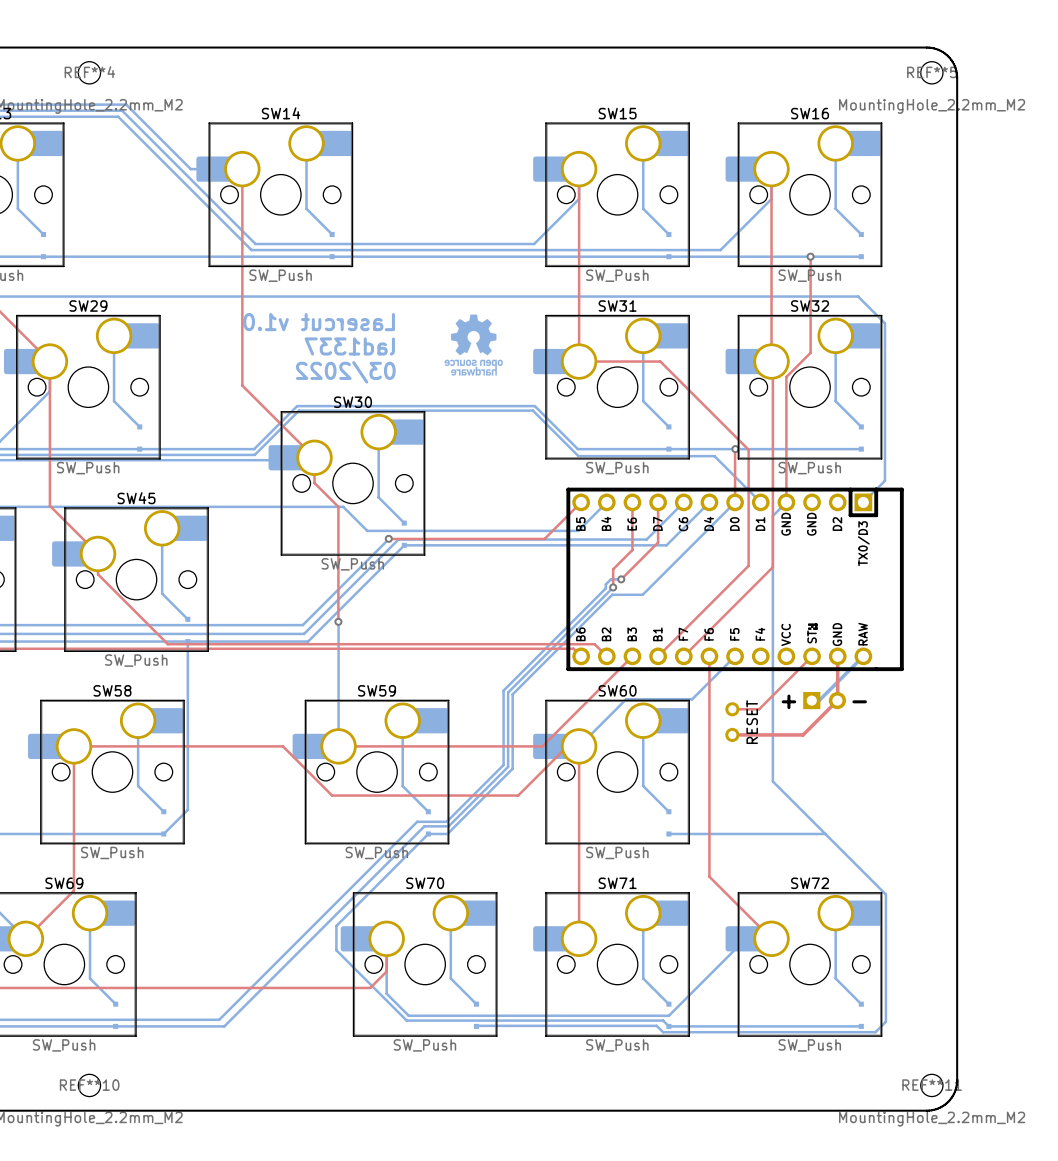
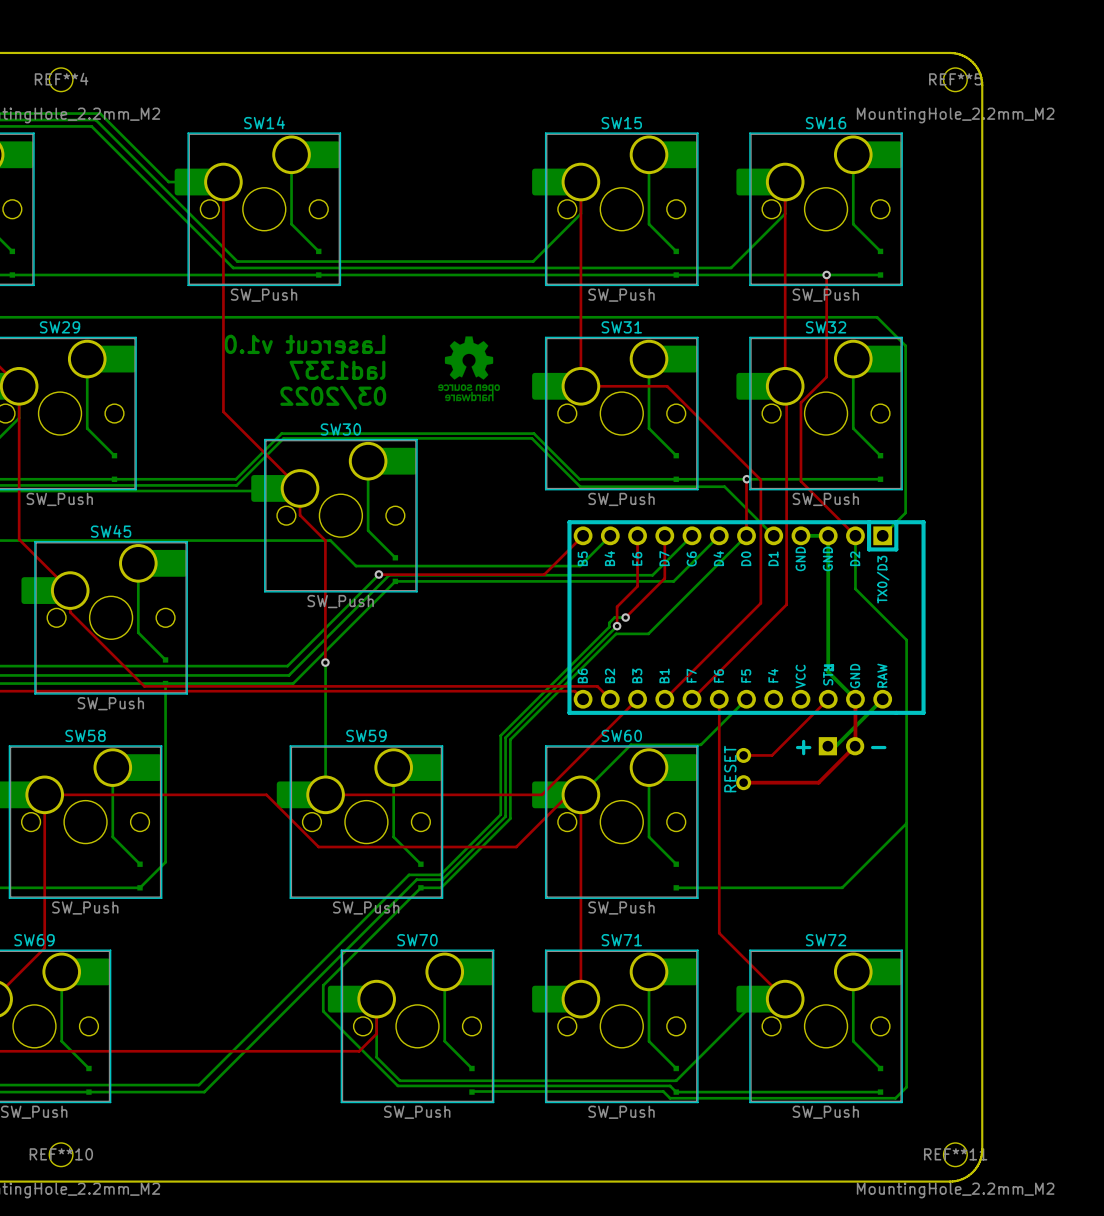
top track: (786, 451) (786, 502) -> (800, 481) (855, 535)
bottom track: (786, 502) (772, 515) (772, 781) (885, 894) -> (855, 535) (855, 588) (906, 640) (906, 952)
bottom track: none -> (800, 535) (828, 535) (828, 672) (855, 699)
text position: RESET (752, 722) -> RESET (730, 769)
bottom track: none -> (906, 823) (842, 887)

